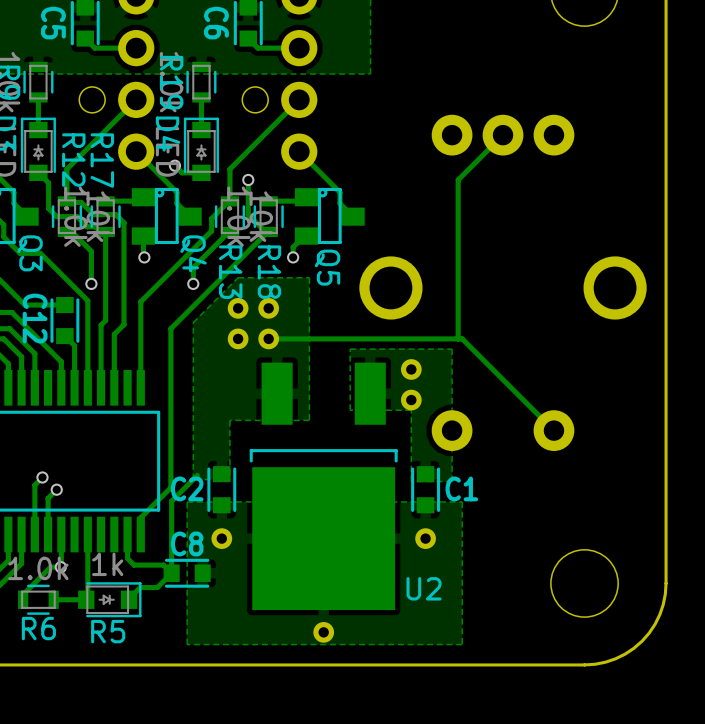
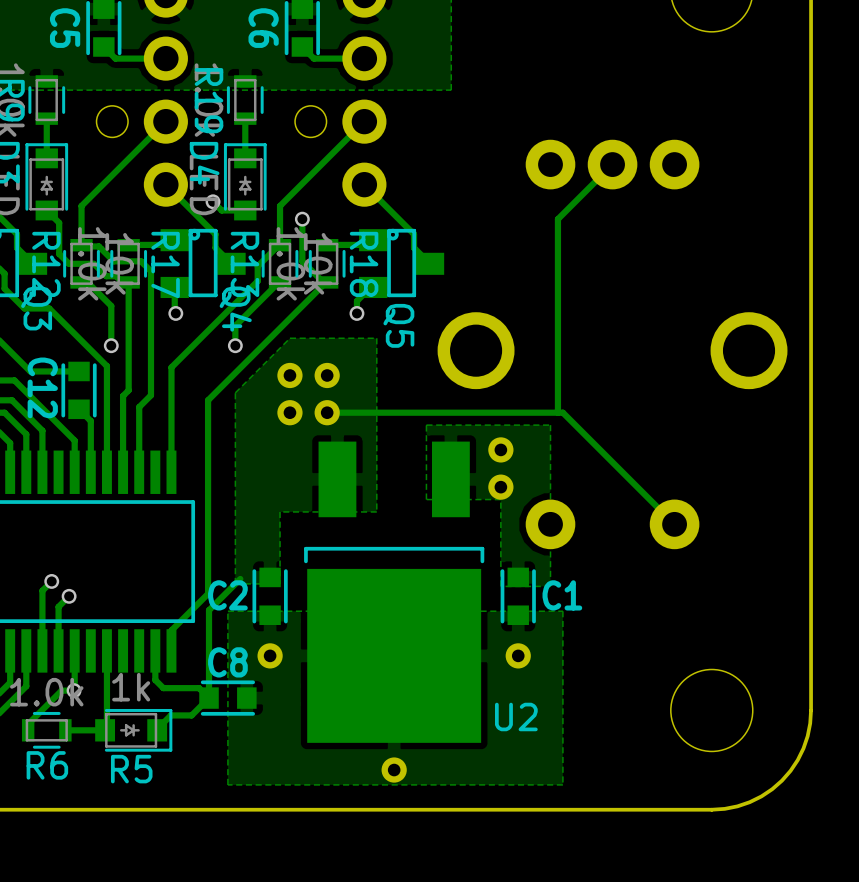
R12 name position: R12 (73, 160) -> R12 (46, 264)
R17 name position: R17 (102, 160) -> R17 (165, 265)
R13 name position: R13 (230, 272) -> R13 (244, 264)
R18 name position: R18 (269, 272) -> R18 (364, 264)

